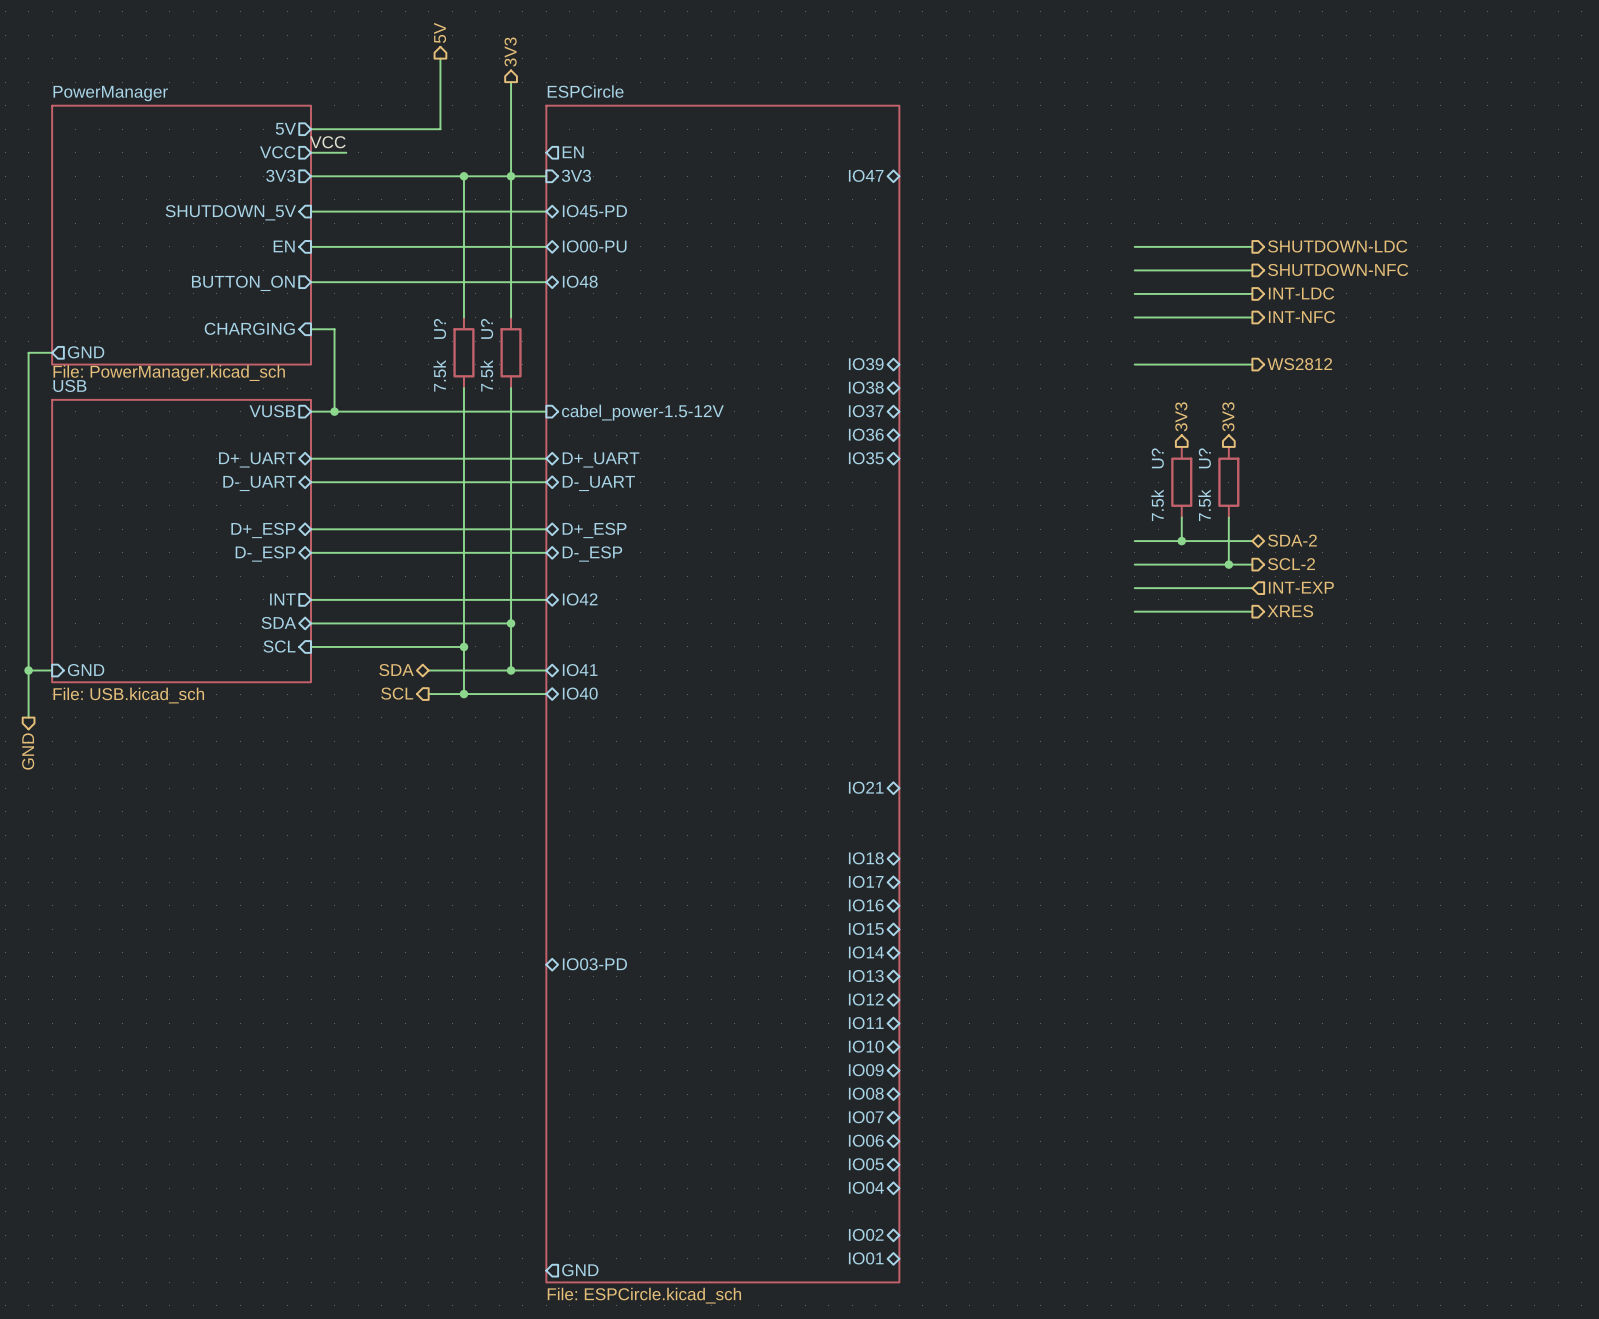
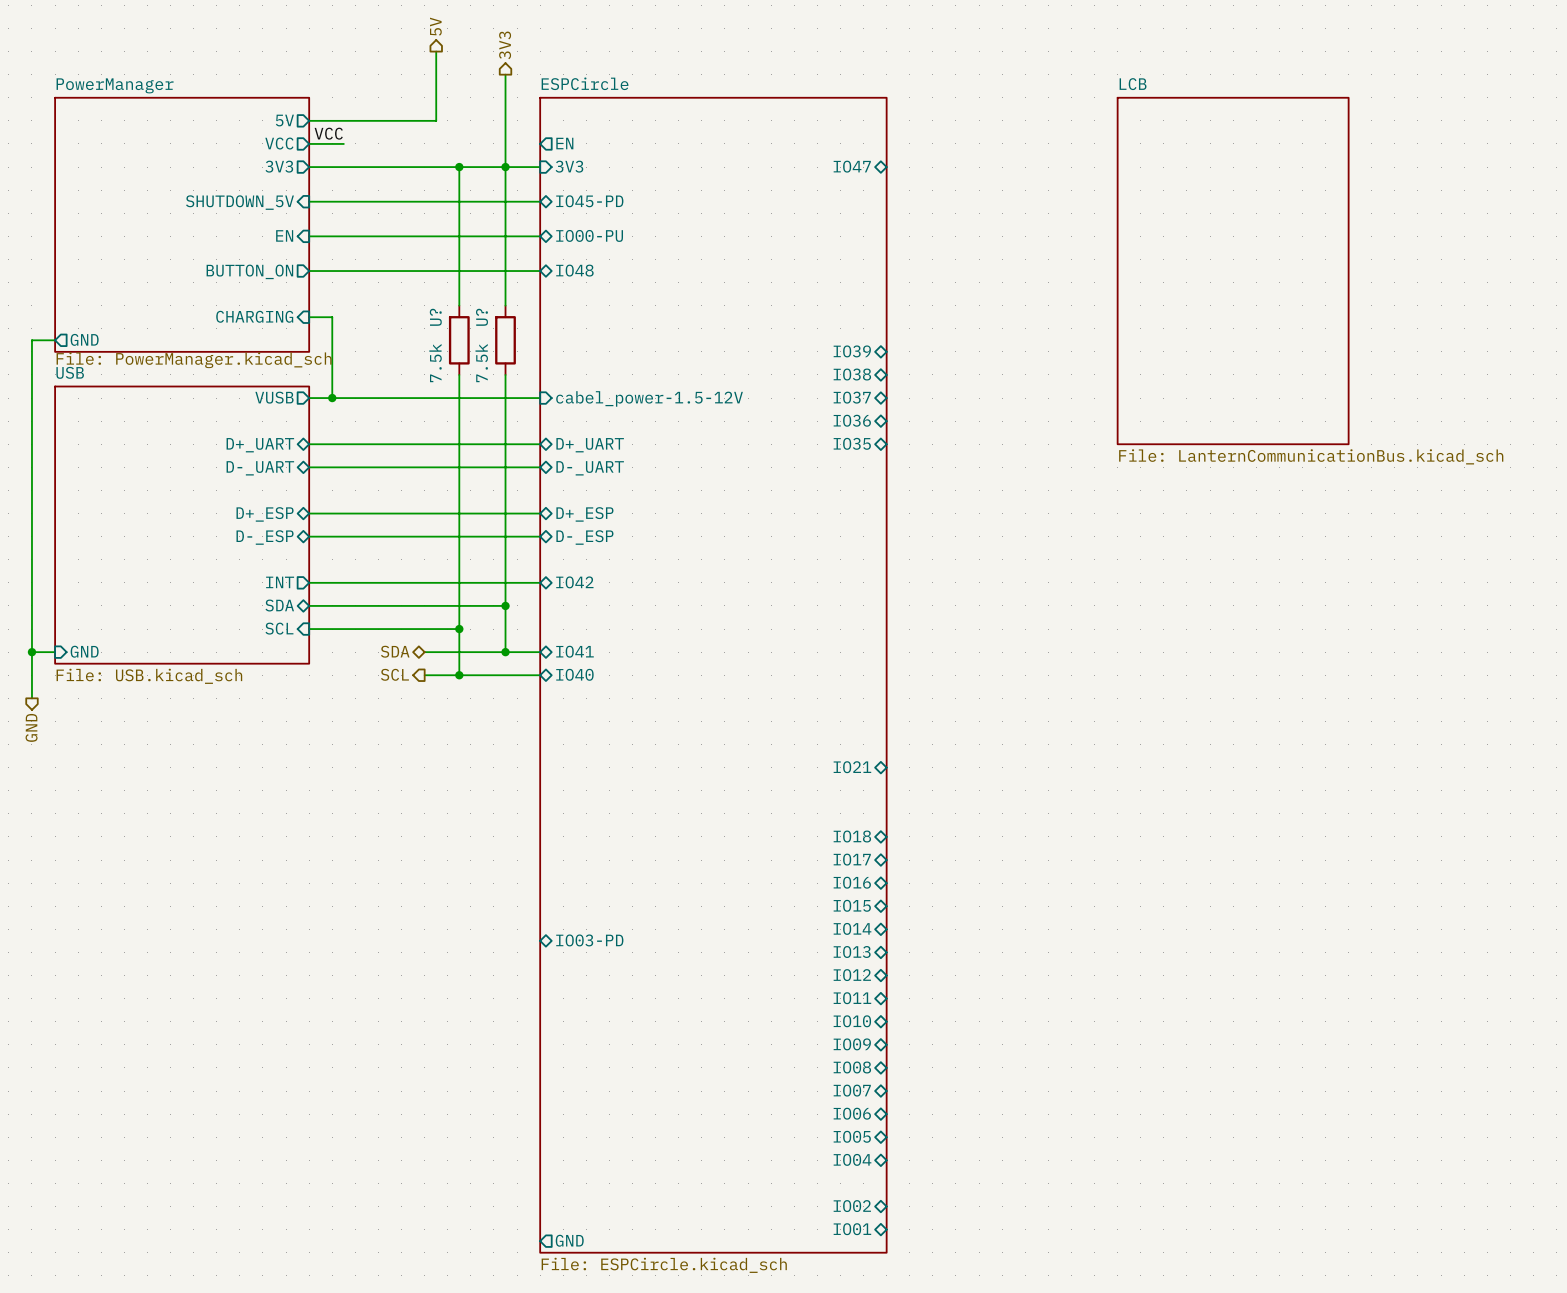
wire: (1134, 246) (1252, 246) -> none
hierarchical label: SHUTDOWN-LDC (1337, 246) -> none
hierarchical label: SHUTDOWN-NFC (1338, 269) -> none
wire: (1134, 270) (1252, 270) -> none
sheet LCB: none -> File: LanternCommunicationBus.kicad_sch (1233, 271)
wire: (1134, 293) (1252, 293) -> none
hierarchical label: INT-LDC (1301, 293) -> none
wire: (1134, 317) (1252, 317) -> none
hierarchical label: INT-NFC (1301, 317) -> none
wire: (1134, 364) (1252, 364) -> none
hierarchical label: WS2812 (1299, 364) -> none
hierarchical label: 3V3 (1181, 416) -> none
hierarchical label: 3V3 (1228, 416) -> none
U?: 7.5k (1181, 482) -> none
U?: 7.5k (1228, 482) -> none
wire: (1181, 517) (1181, 541) -> none
wire: (1228, 517) (1228, 564) -> none
hierarchical label: SDA-2 (1292, 540) -> none
wire: (1134, 541) (1252, 541) -> none
junction: (1181, 541) -> none
wire: (1134, 564) (1252, 564) -> none
junction: (1228, 564) -> none
hierarchical label: SCL-2 (1291, 564) -> none
hierarchical label: INT-EXP (1301, 587) -> none
wire: (1134, 588) (1252, 588) -> none
wire: (1134, 611) (1252, 611) -> none
hierarchical label: XRES (1290, 611) -> none

